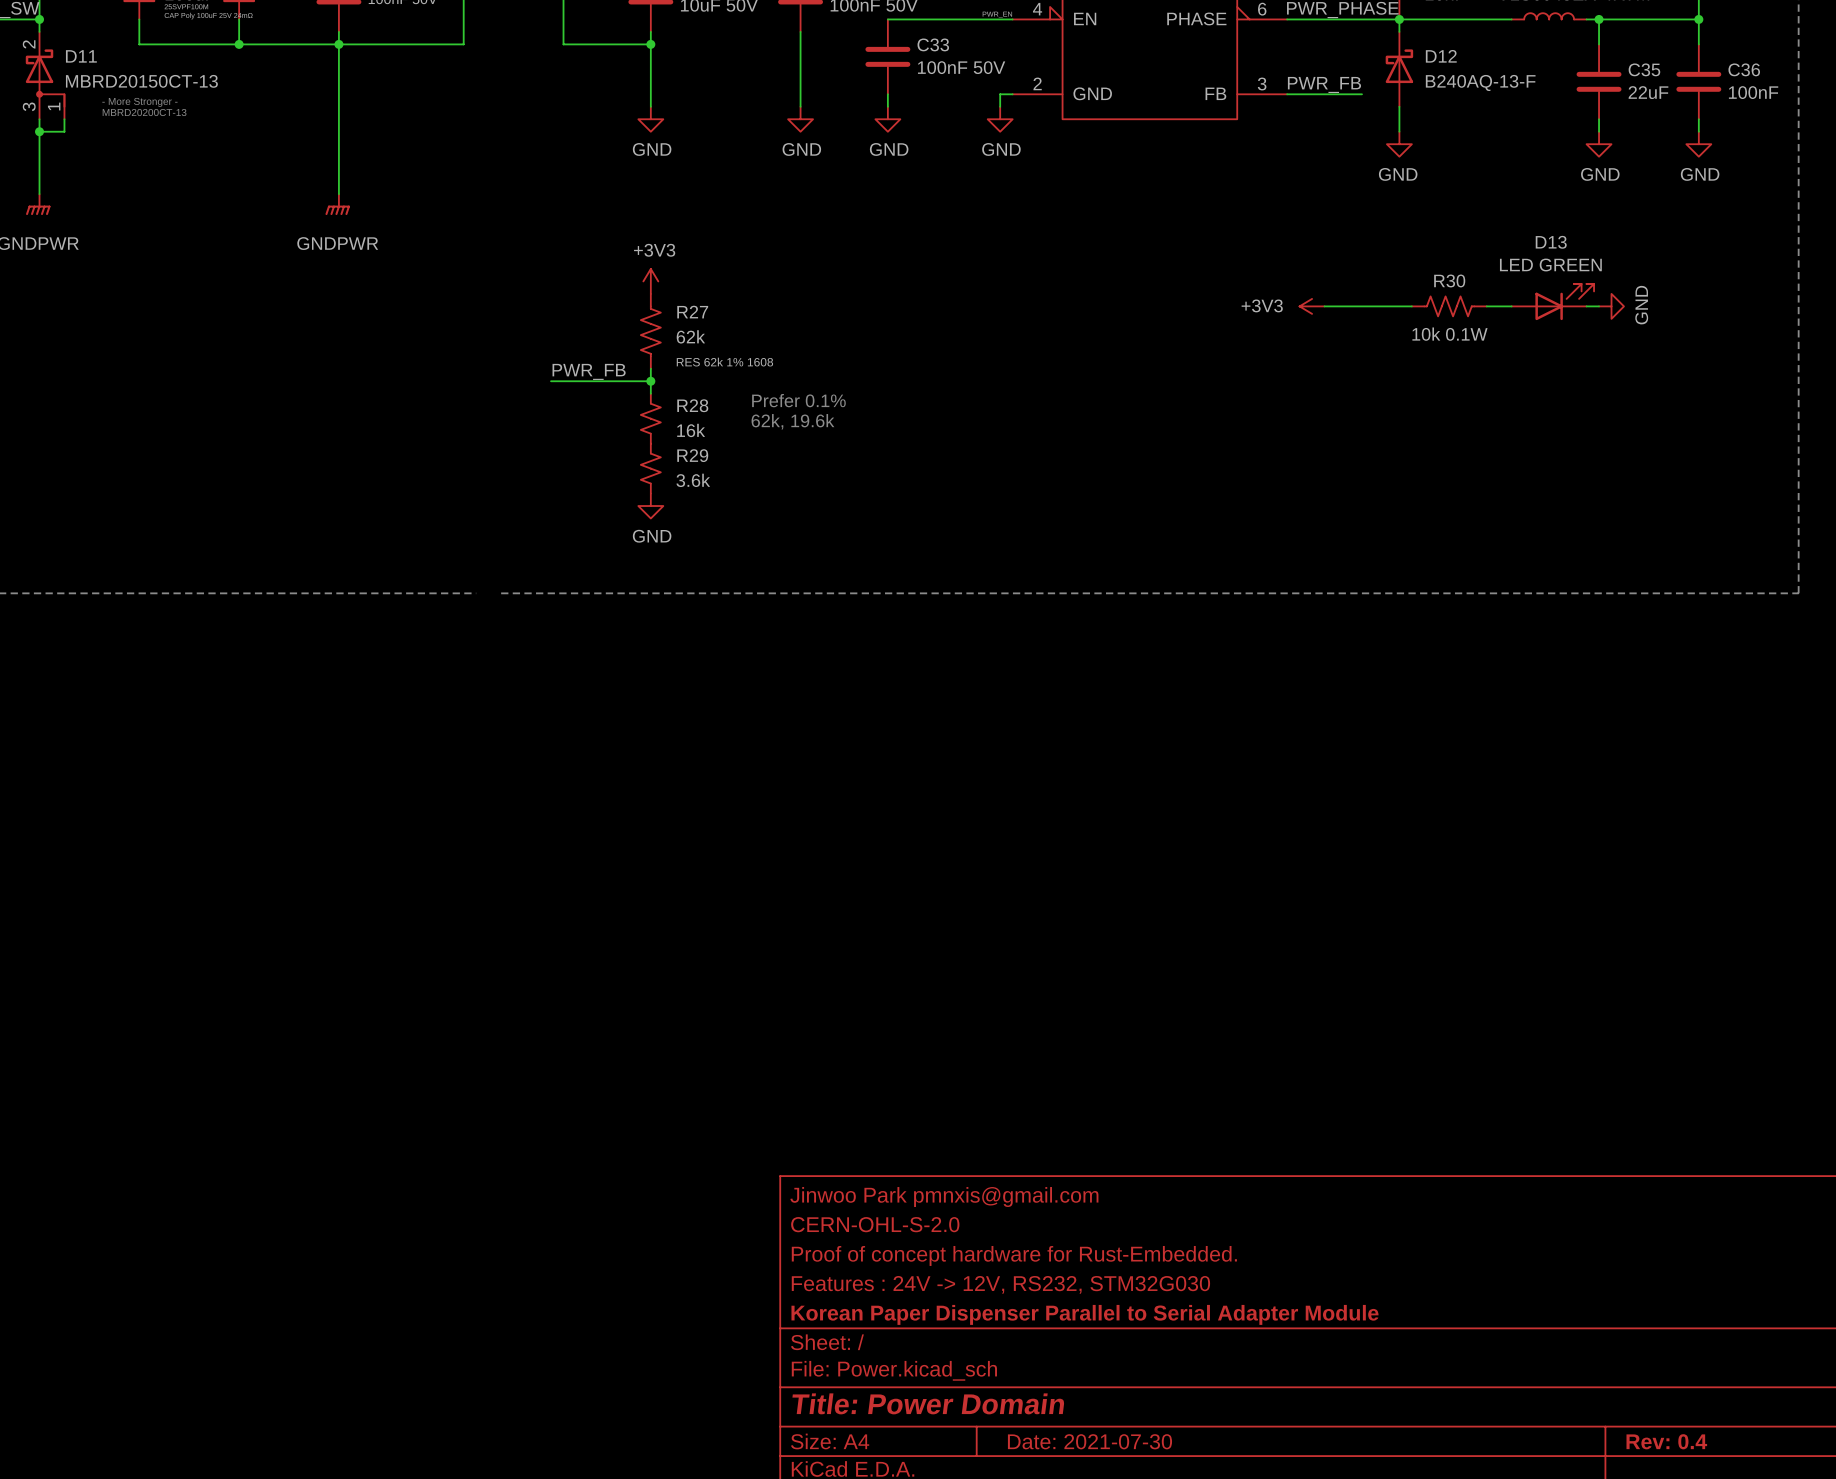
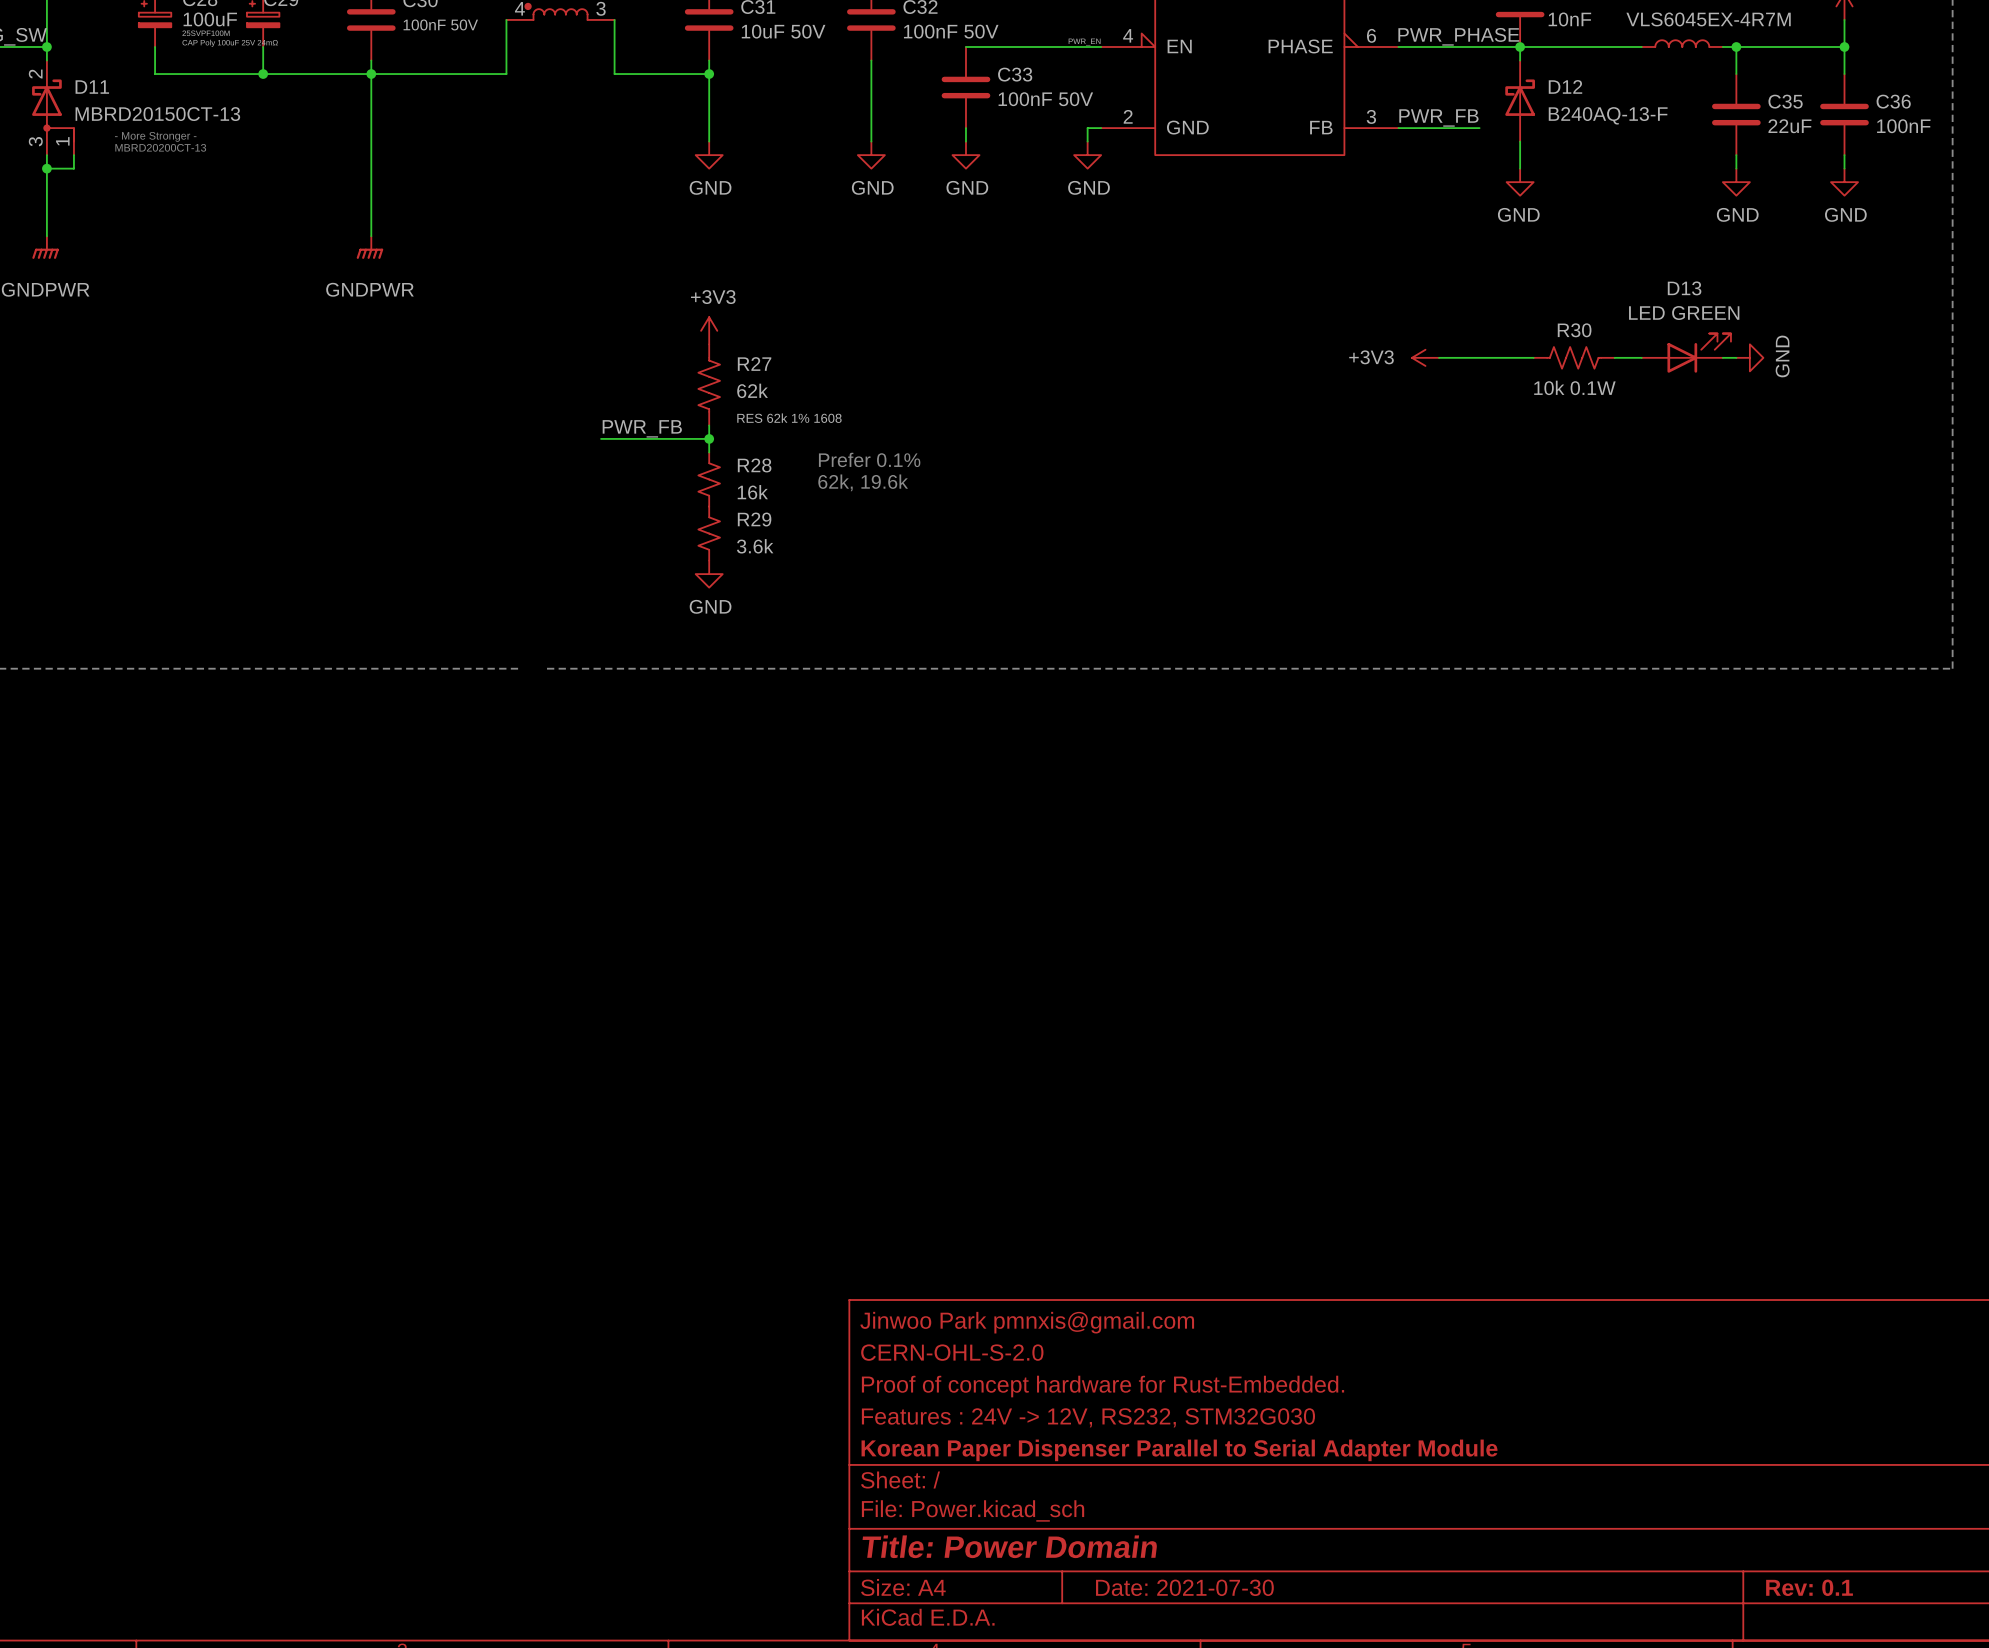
title block: Rev: 0.4 (1666, 1441) -> Rev: 0.1 (1809, 1587)

